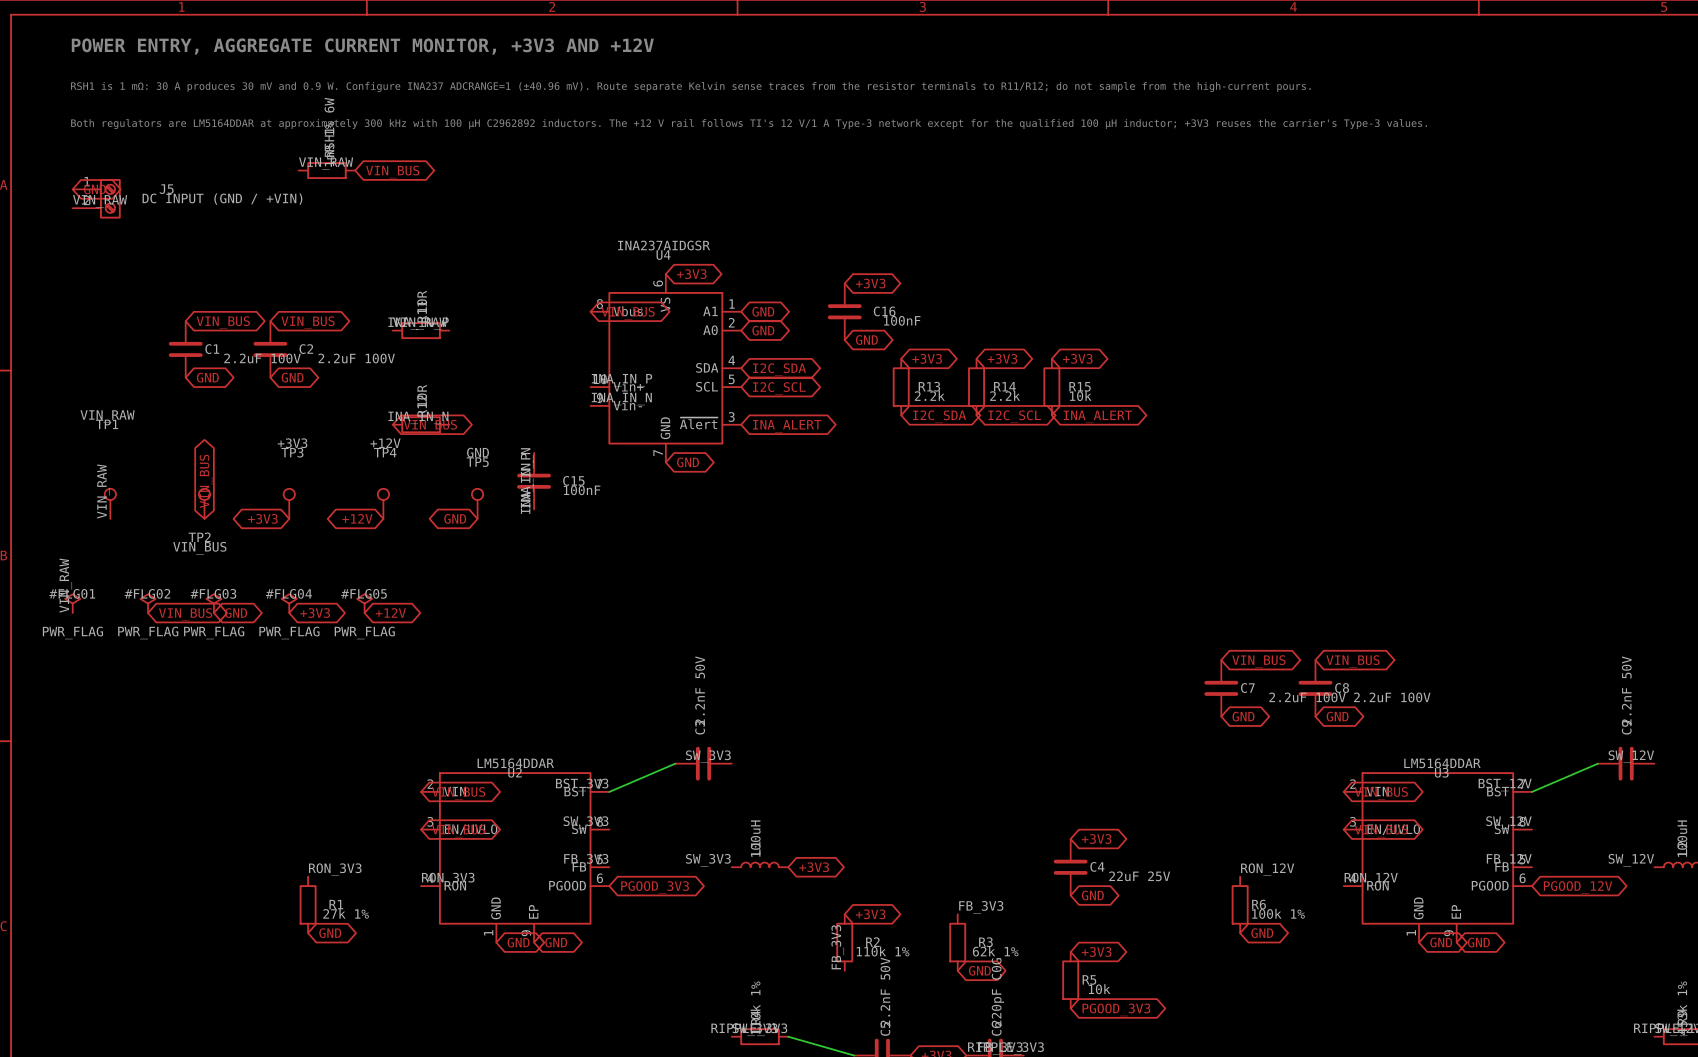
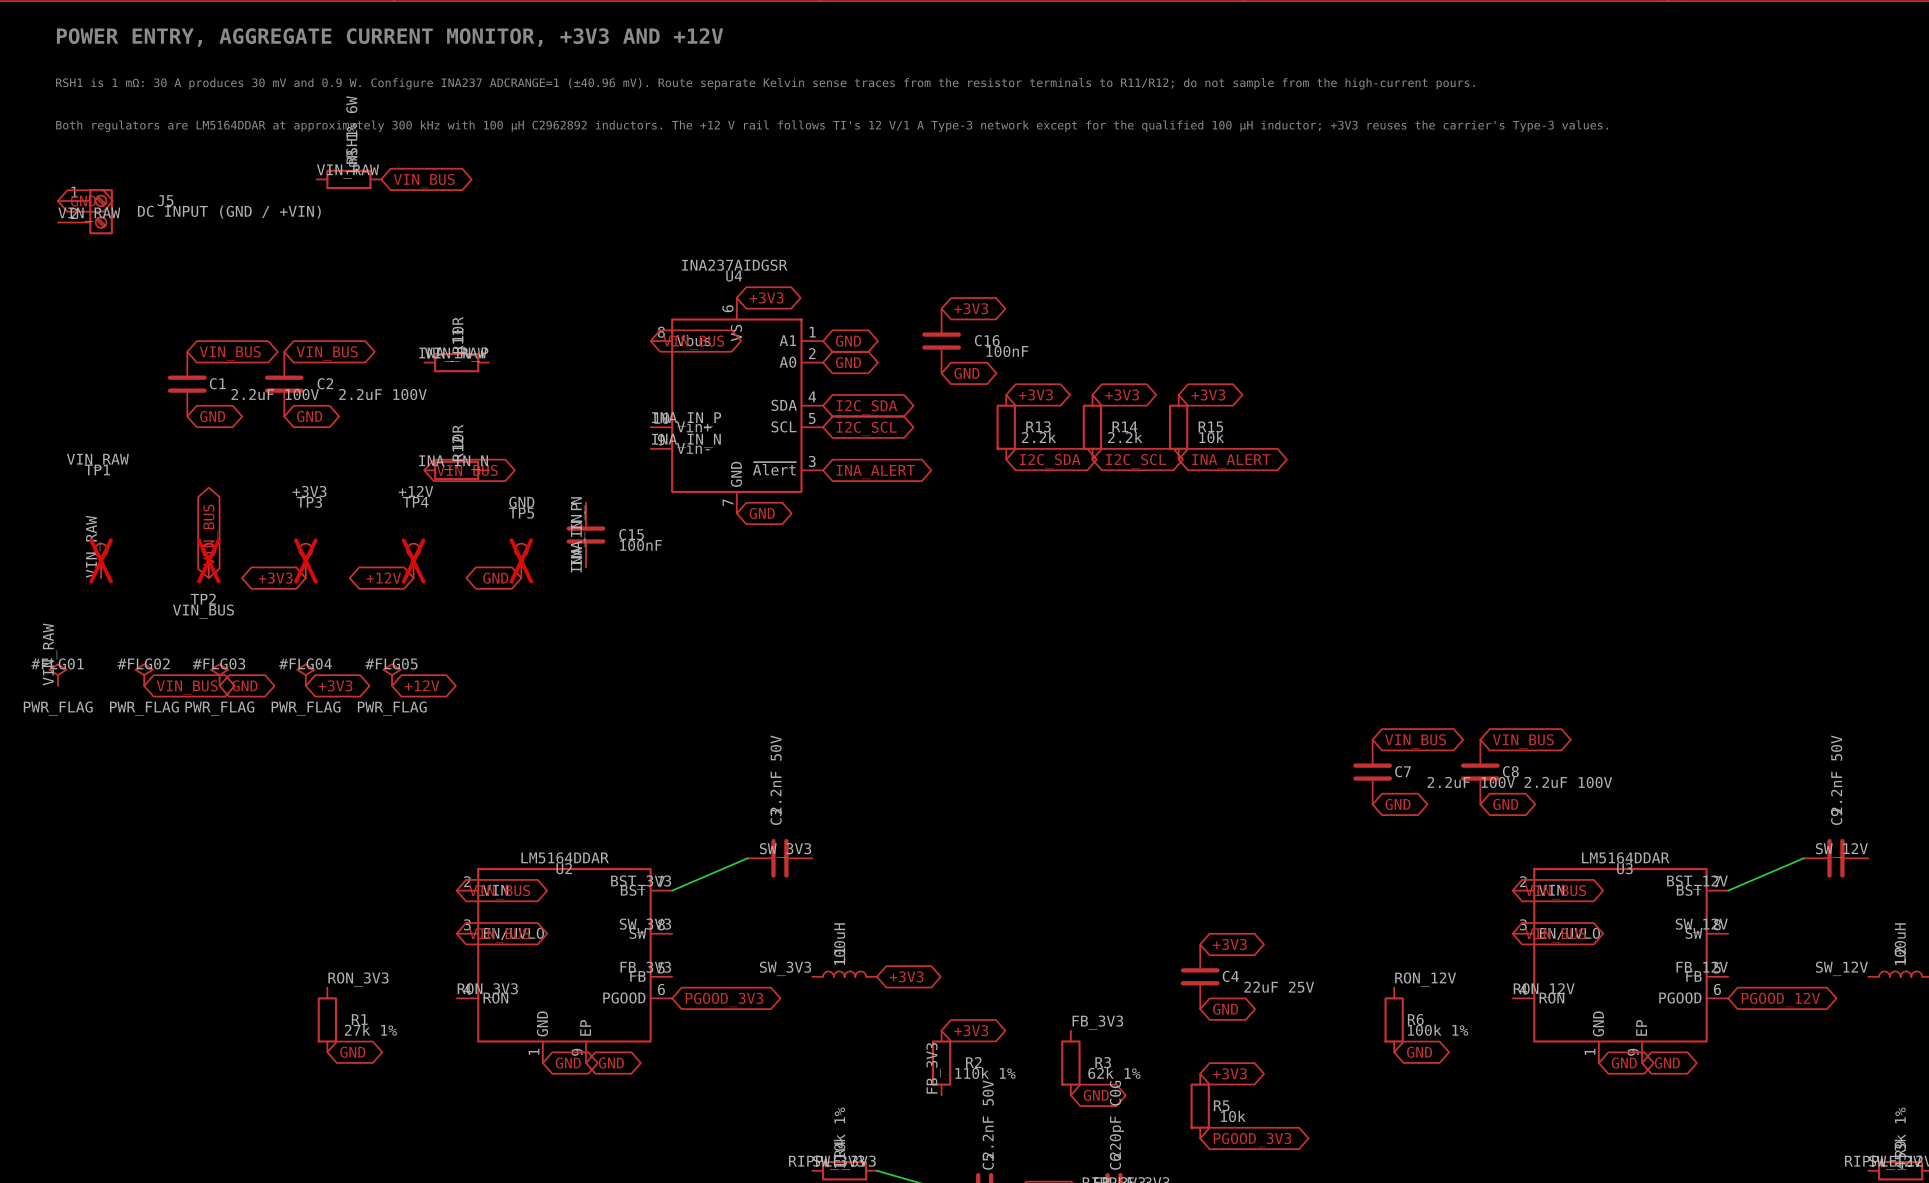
TP1 do-not-place cross: none -> (101, 560)
TP2 do-not-place cross: none -> (208, 560)
TP3 do-not-place cross: none -> (305, 560)
TP4 do-not-place cross: none -> (413, 560)
TP5 do-not-place cross: none -> (521, 560)

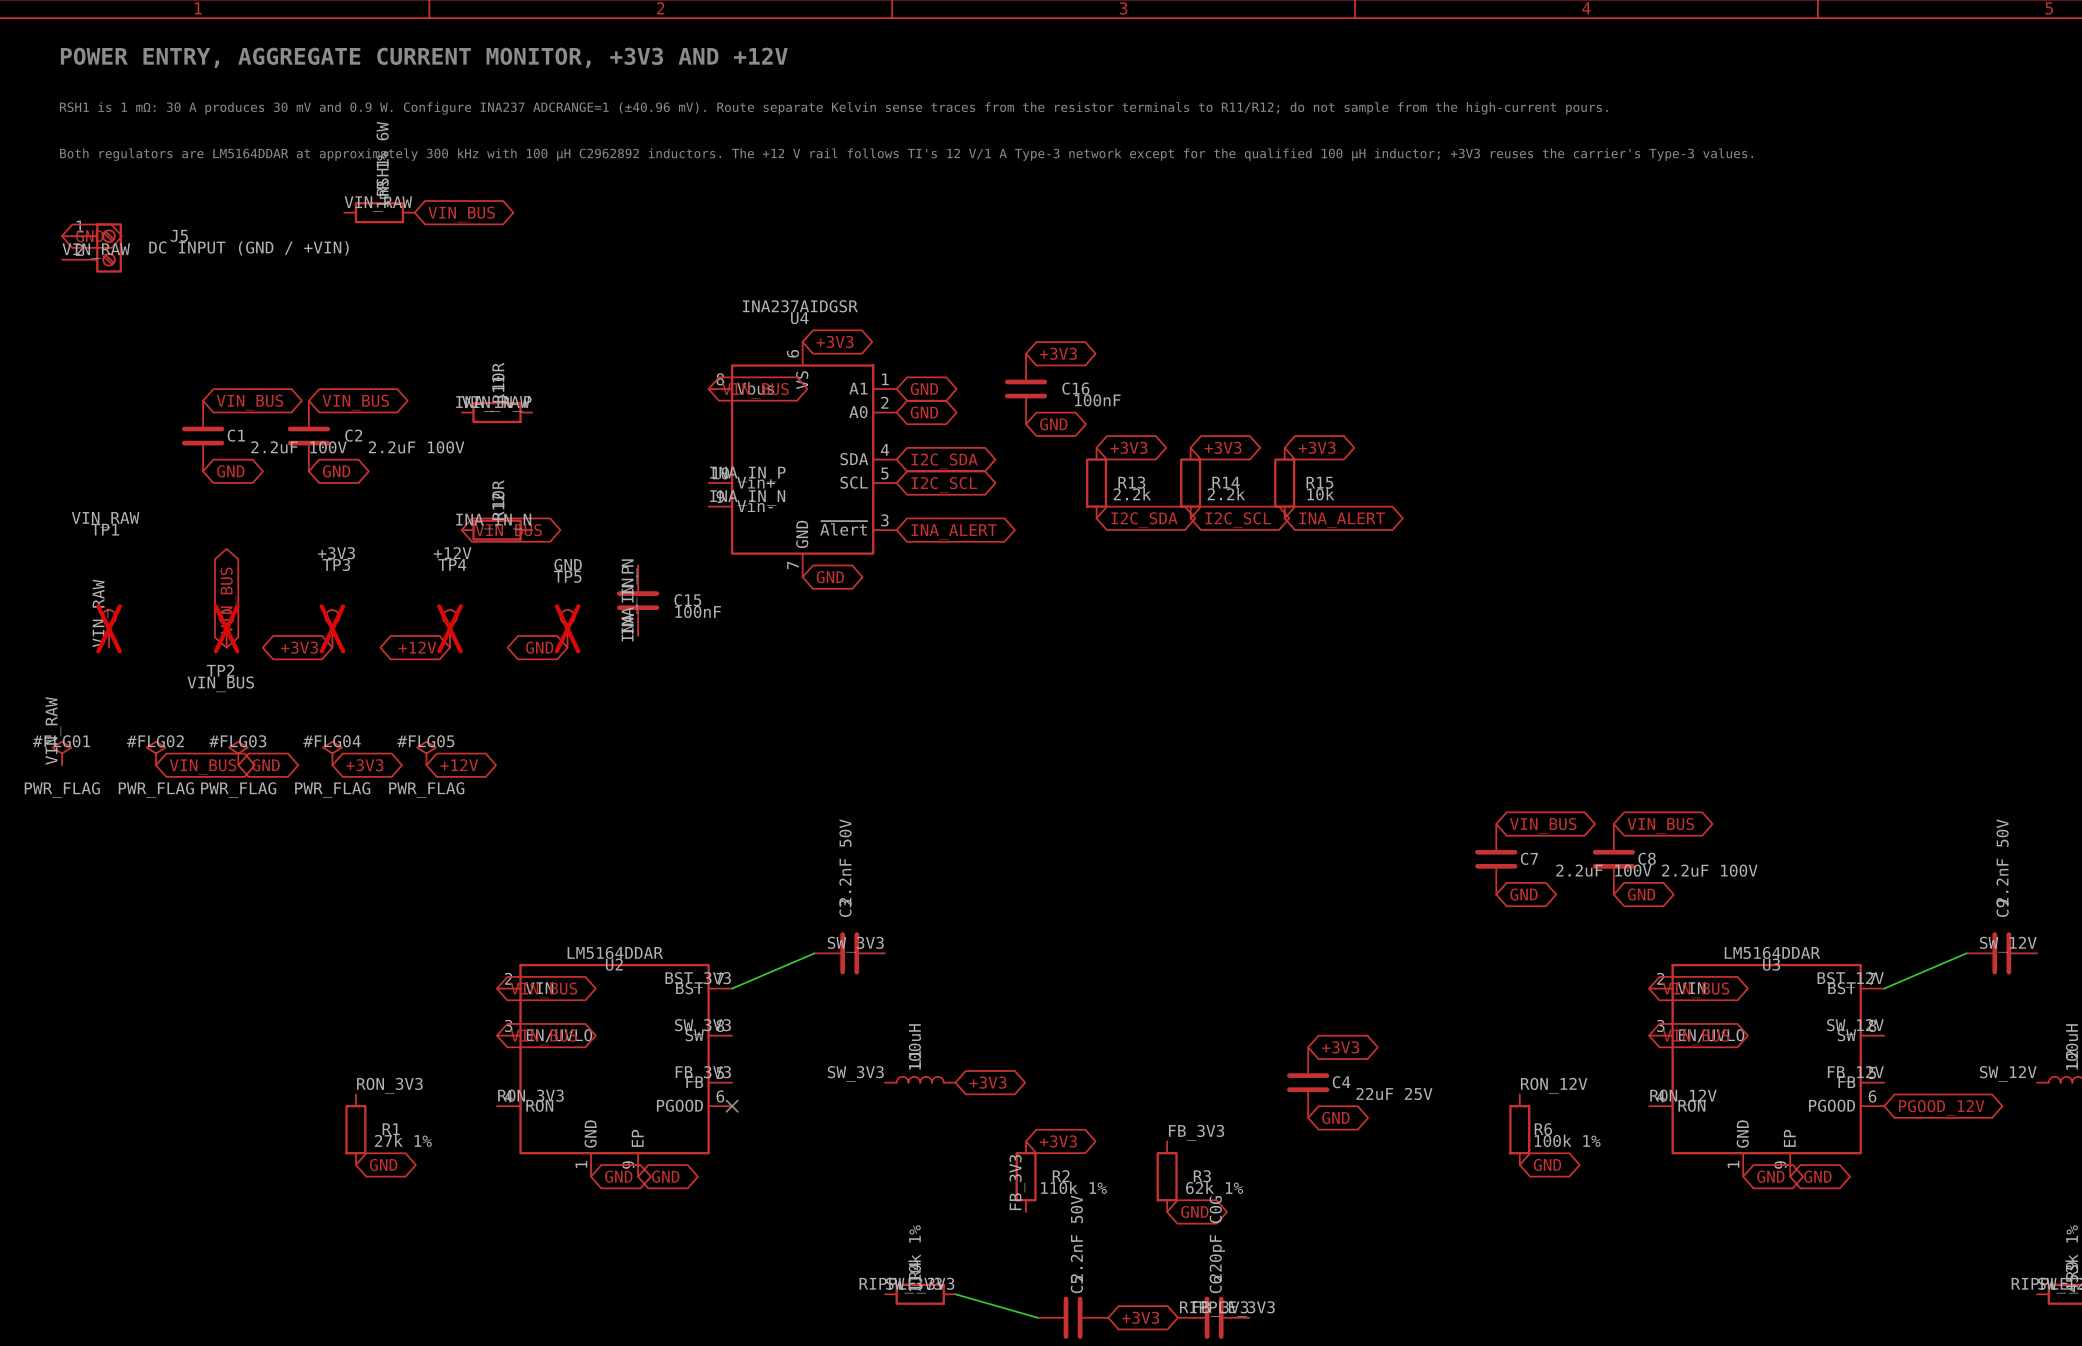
no-connect mark: none -> (732, 1106)
global label: PGOOD_3V3 (724, 1000) -> none
global label: +3V3 (1229, 1073) -> none
R5: 10k (1200, 1106) -> none
global label: PGOOD_3V3 (1252, 1140) -> none

